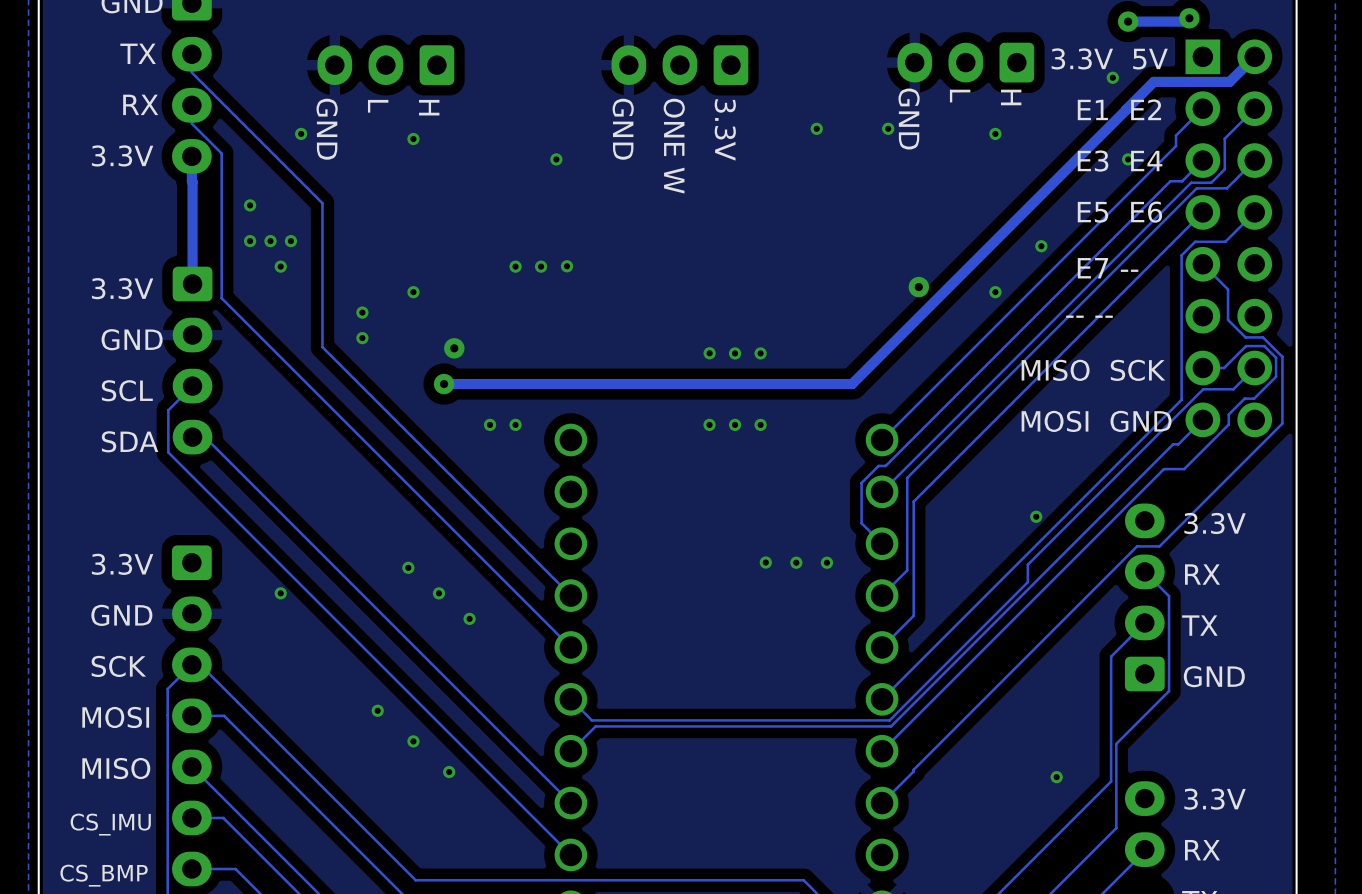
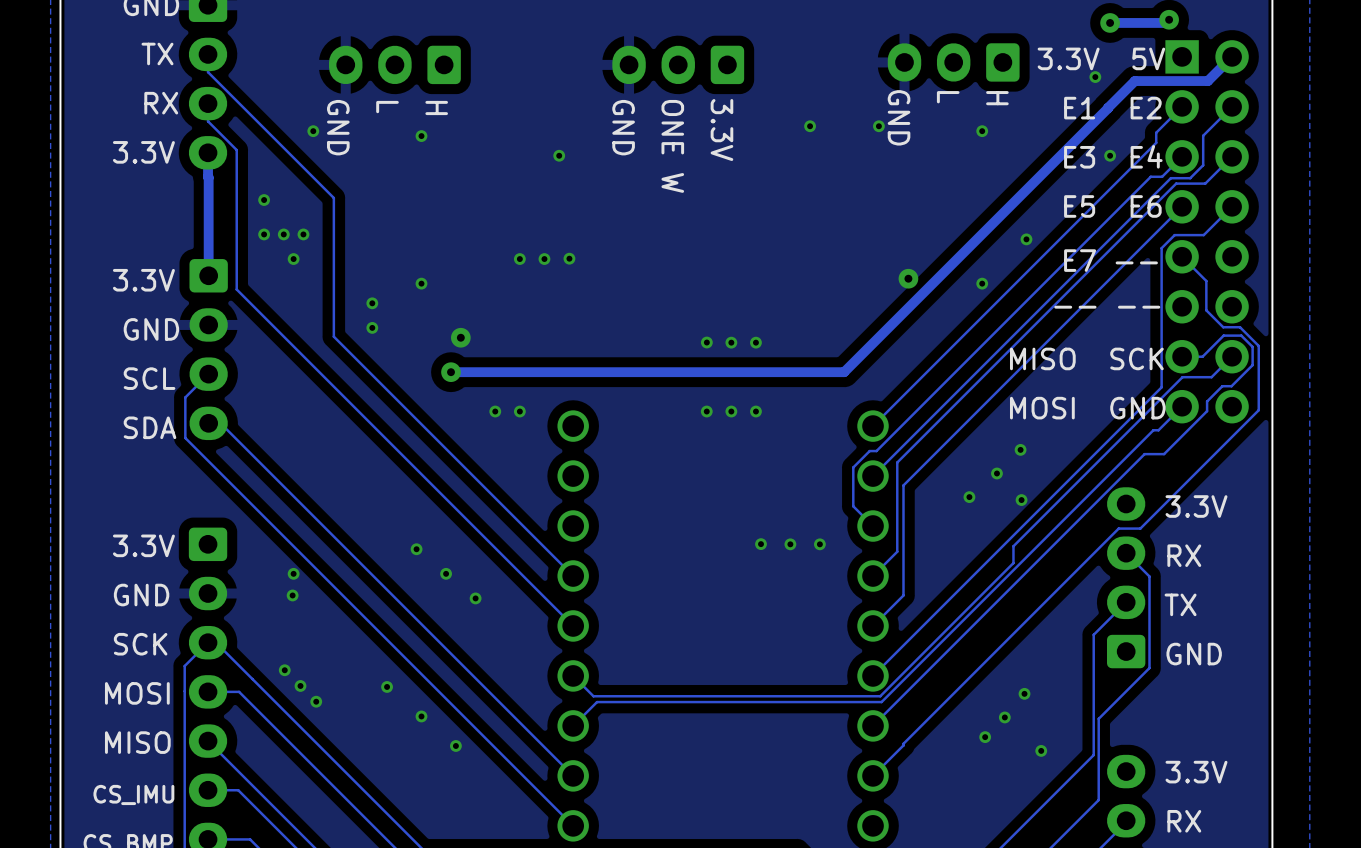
via: none -> (1020, 449)
via: none -> (996, 473)
via: none -> (969, 497)
via: none -> (292, 595)
via: none -> (284, 670)
via: none -> (300, 685)
via: none -> (1024, 693)
via: none -> (316, 701)
via: none -> (1004, 717)
via: none -> (985, 737)

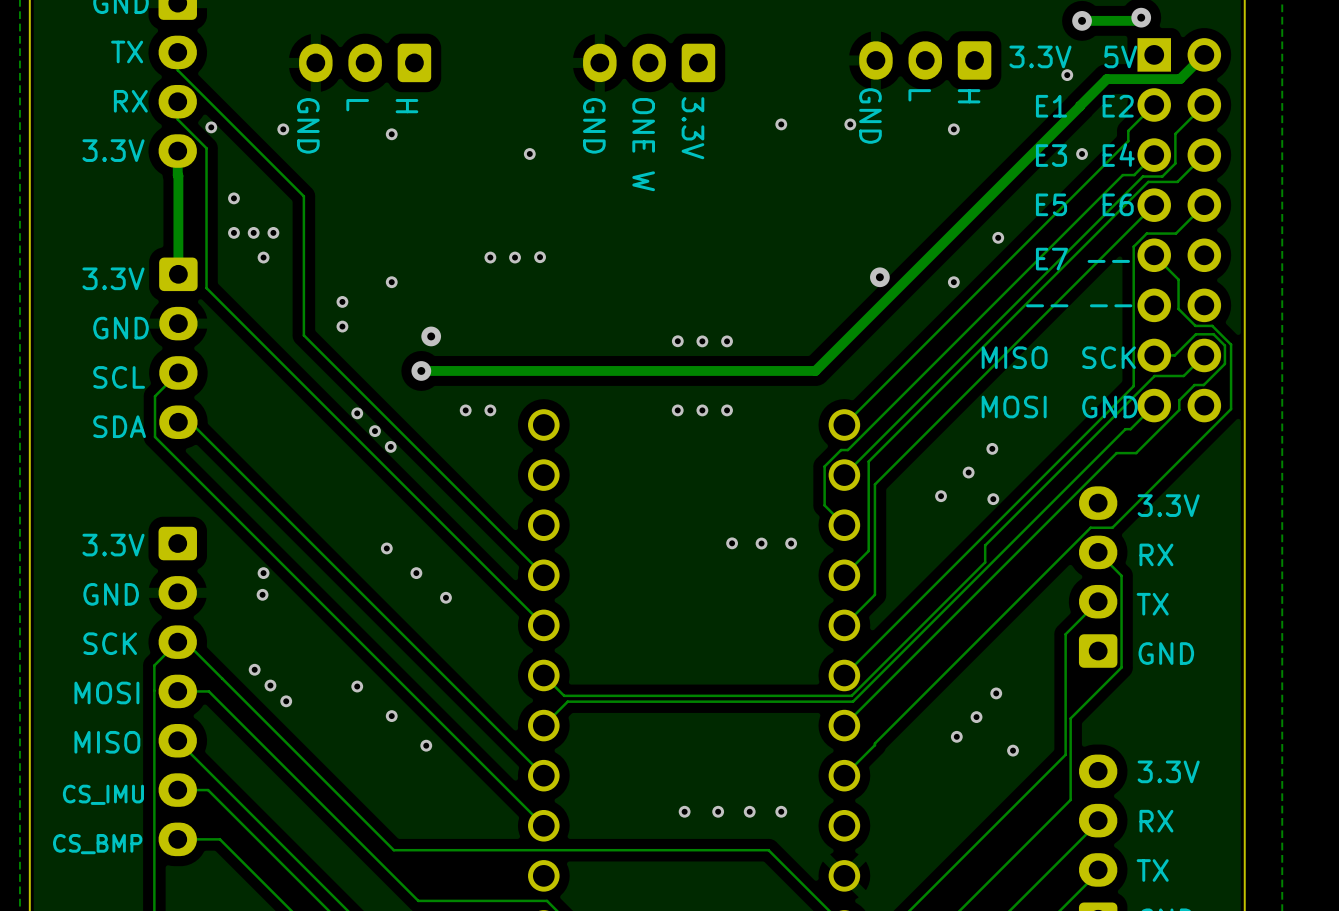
via: none -> (211, 127)
via: none -> (357, 413)
via: none -> (374, 431)
via: none -> (390, 446)
via: none -> (684, 811)
via: none -> (718, 811)
via: none -> (749, 811)
via: none -> (781, 811)

